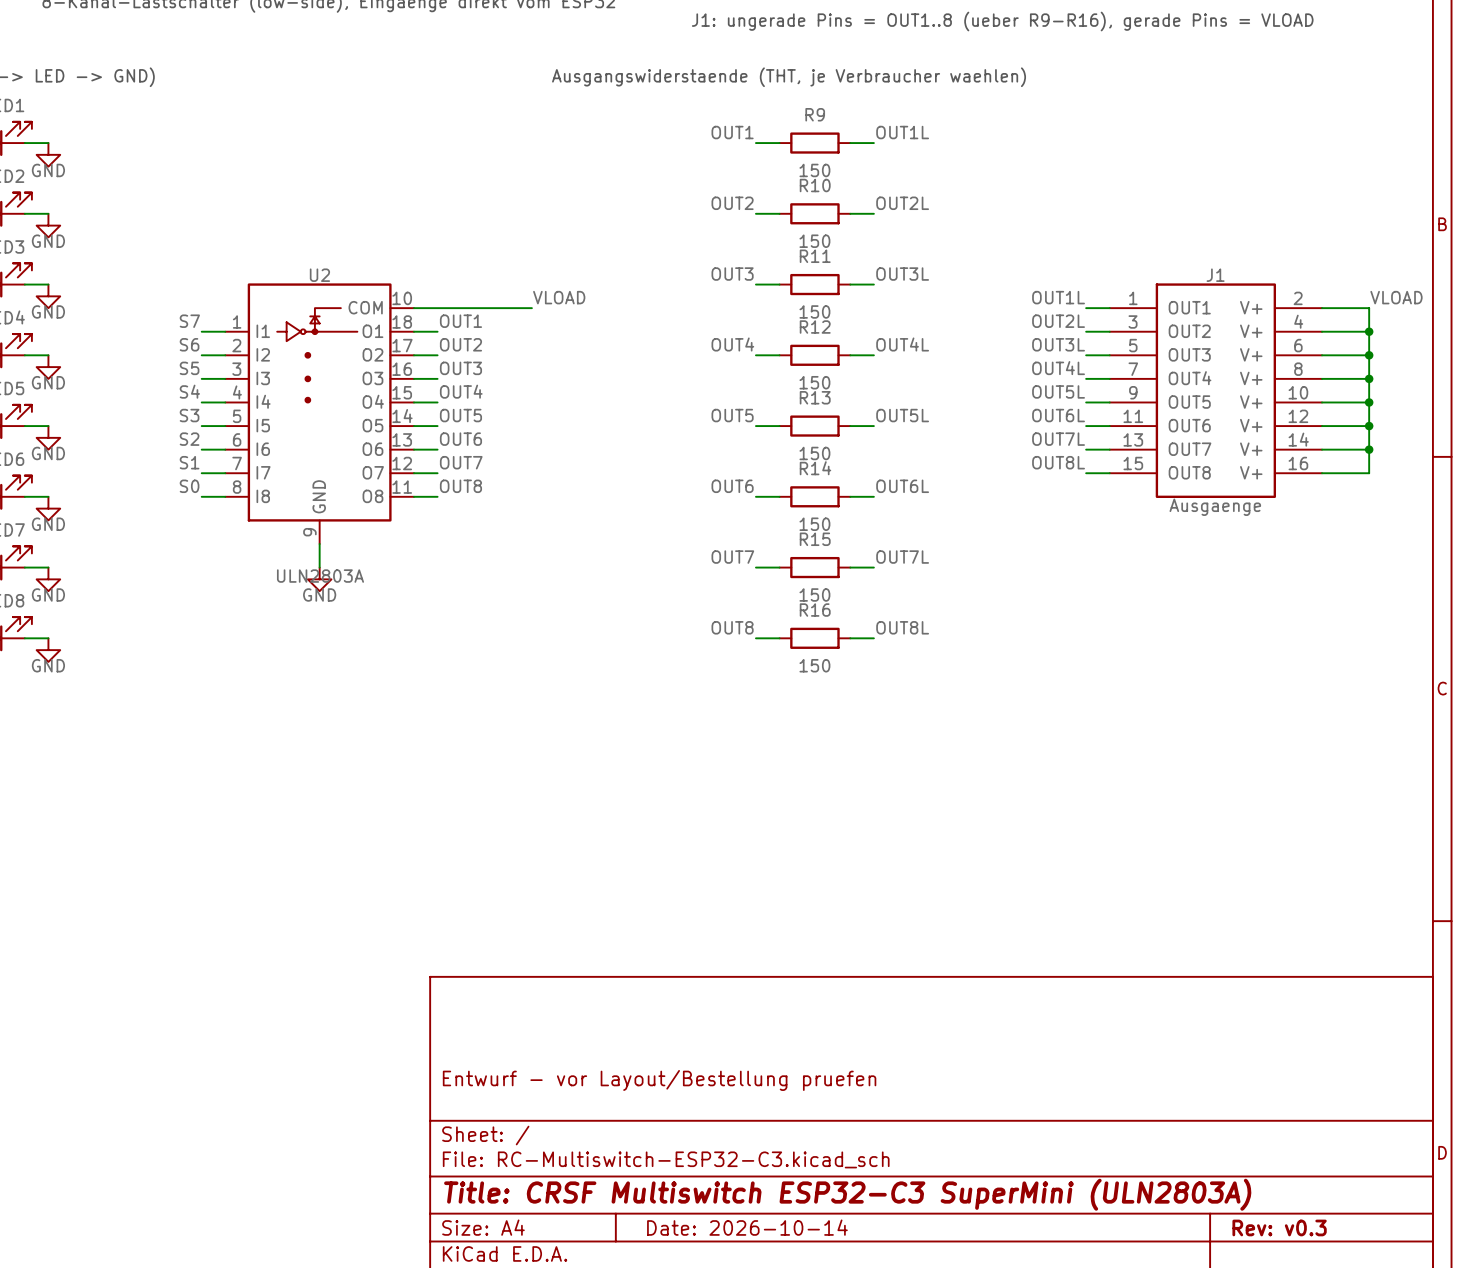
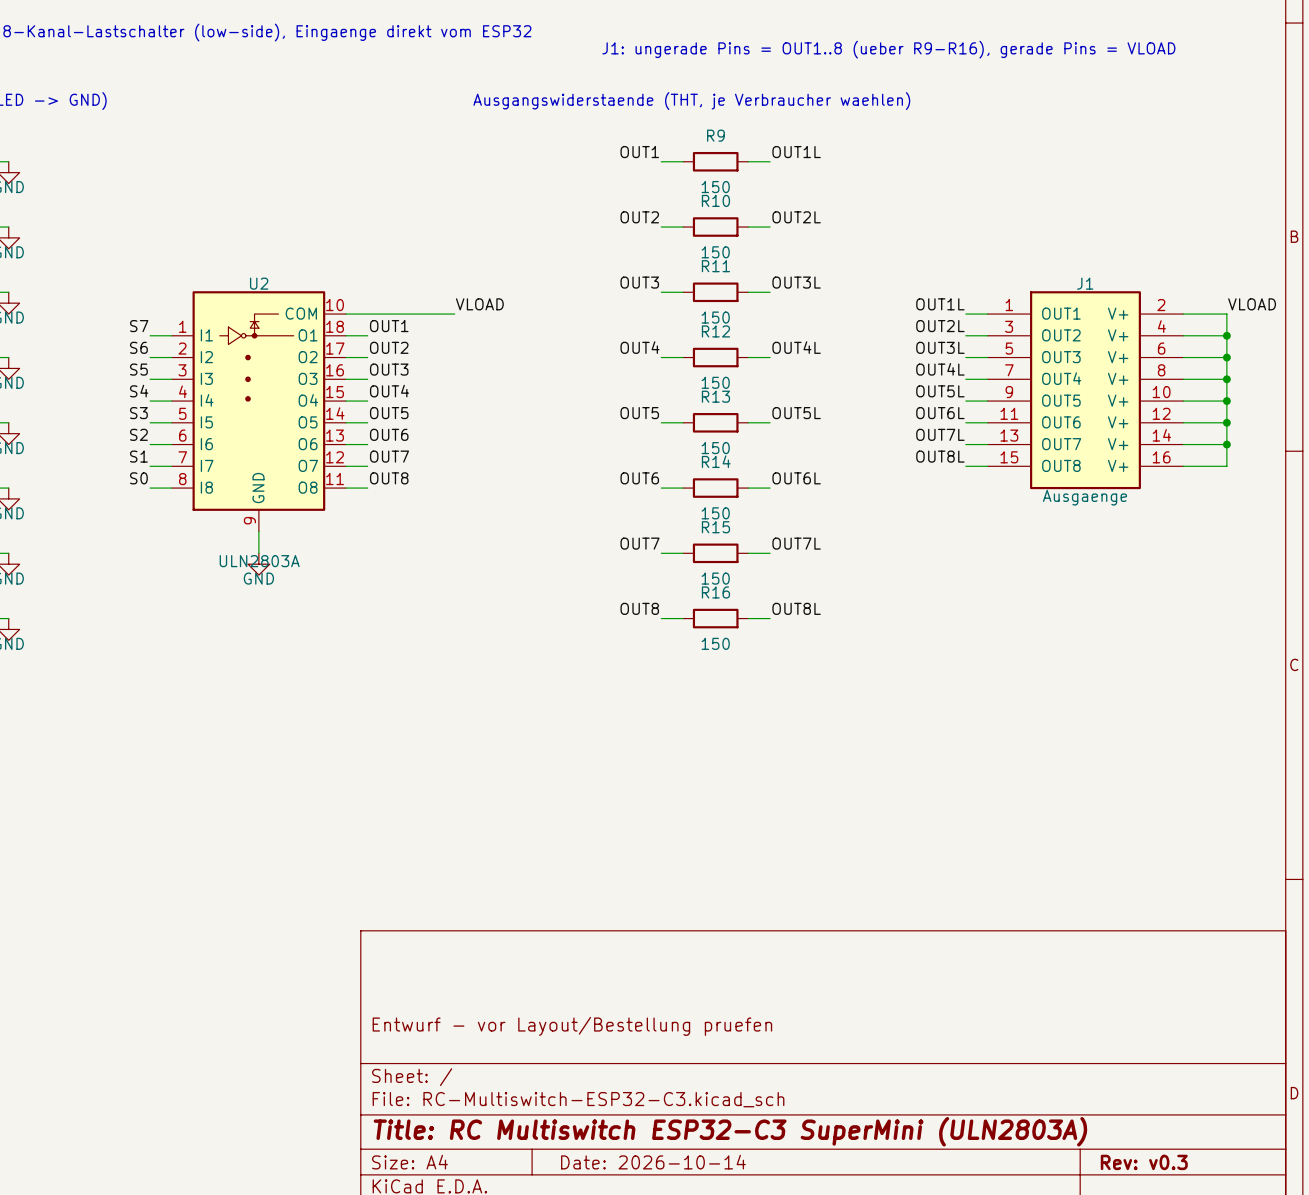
title block: Title: CRSF Multiswitch ESP32-C3 SuperMini (ULN2803A) (847, 1194) -> Title: RC Multiswitch ESP32-C3 SuperMini (ULN2803A) (730, 1131)

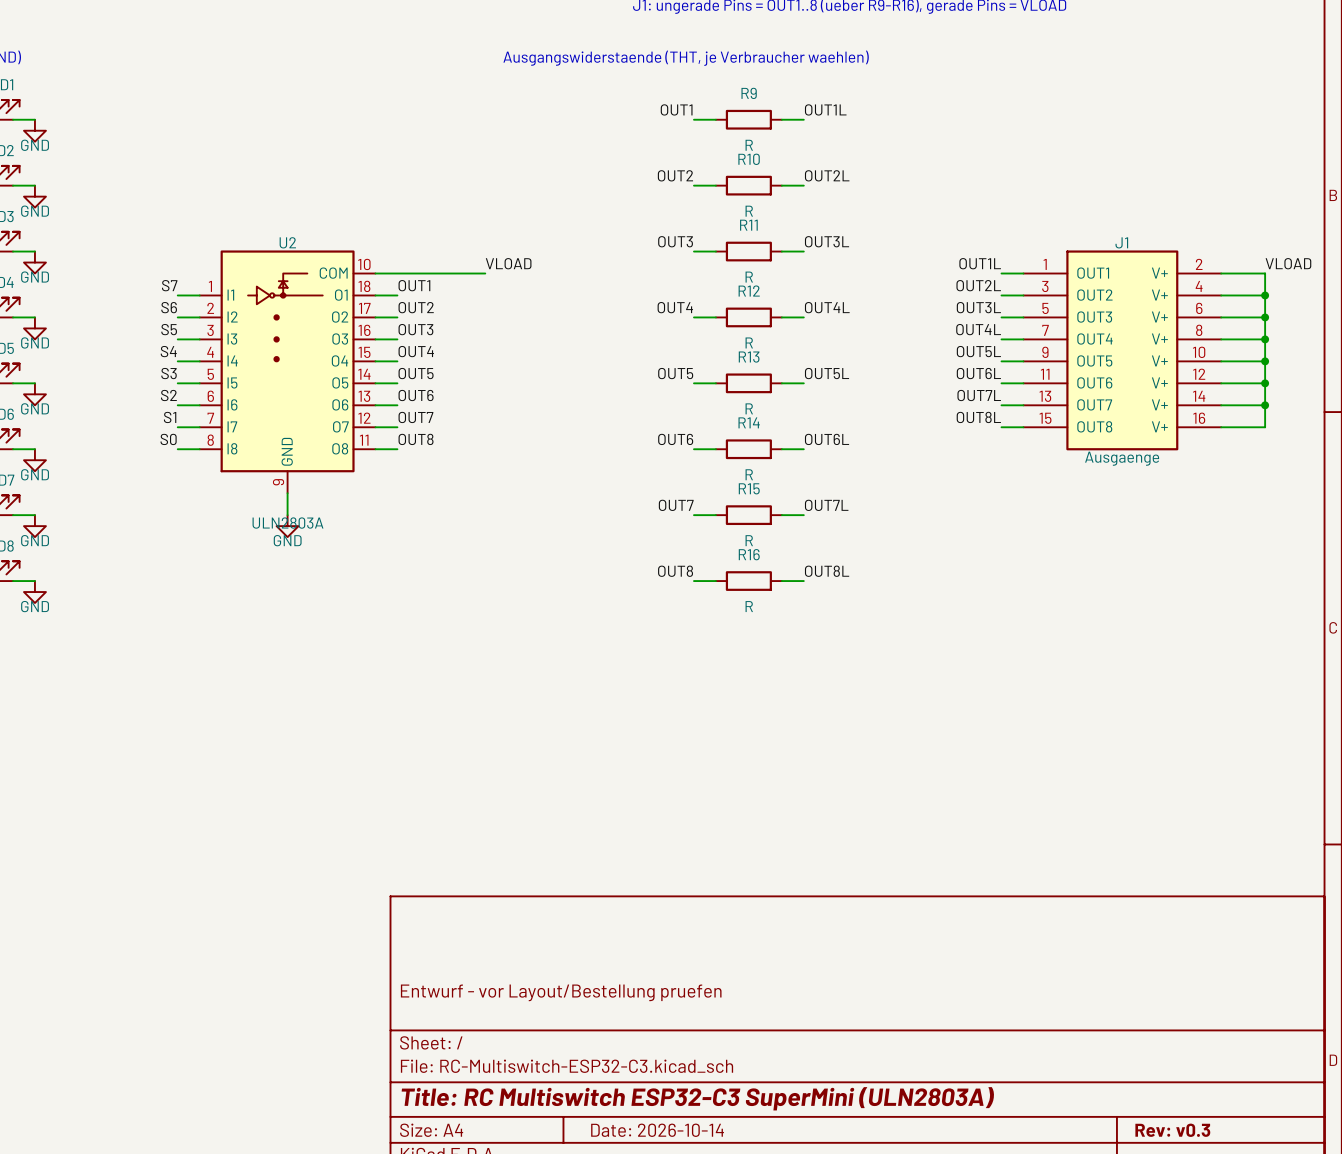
R9 value: 150 (715, 187) -> R (749, 145)
R10 value: 150 (715, 252) -> R (749, 211)
R11 value: 150 (715, 317) -> R (749, 277)
R12 value: 150 (715, 382) -> R (749, 342)
R13 value: 150 (715, 448) -> R (749, 408)
R14 value: 150 (715, 513) -> R (749, 474)
R15 value: 150 (715, 578) -> R (749, 540)
R16 value: 150 (715, 643) -> R (749, 606)

